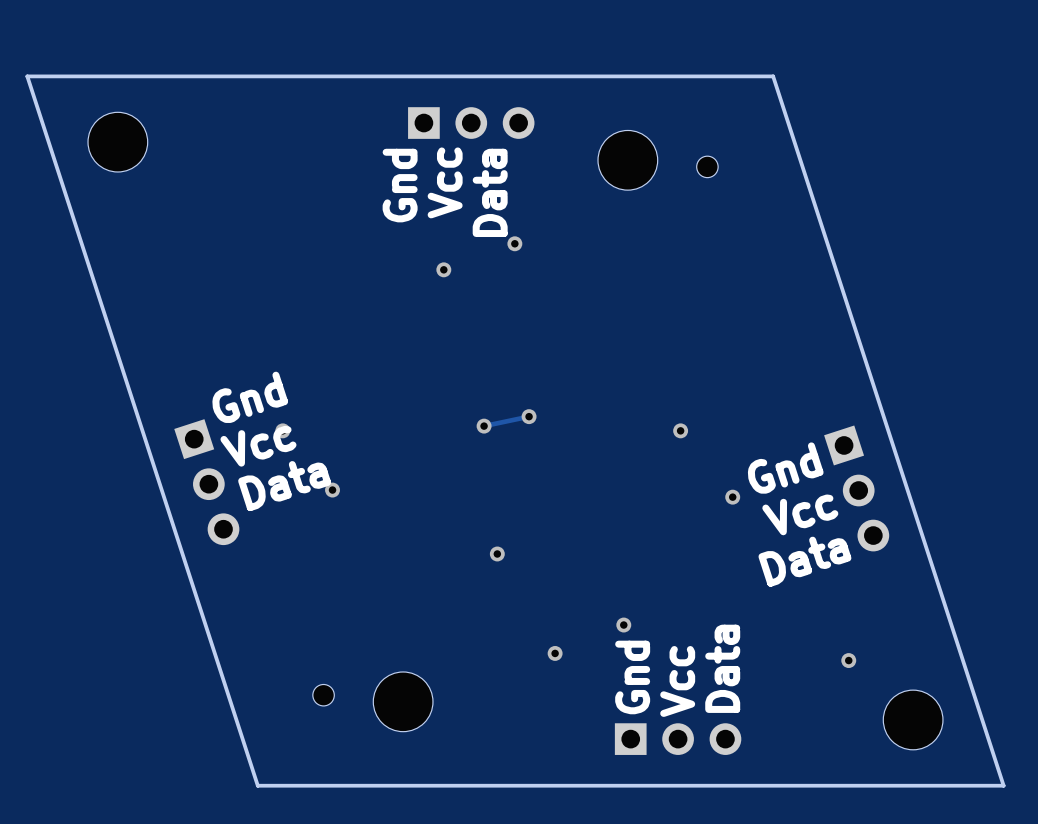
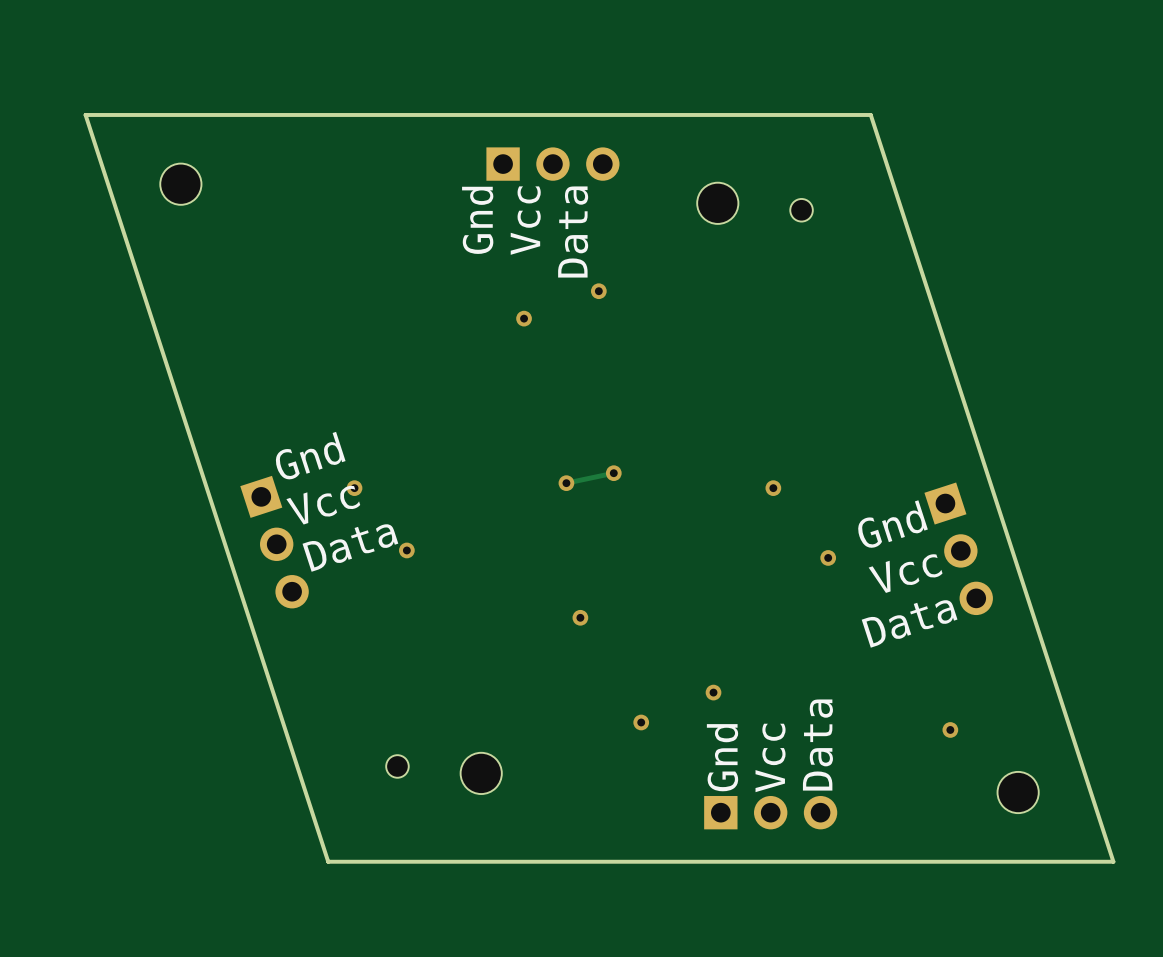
part footprint: [88, 112, 148, 172] -> [160, 163, 202, 205]
part footprint: [598, 130, 658, 191] -> [697, 182, 739, 224]
part footprint: [373, 671, 433, 732] -> [460, 752, 502, 795]
part footprint: [883, 690, 943, 750] -> [997, 771, 1039, 814]

